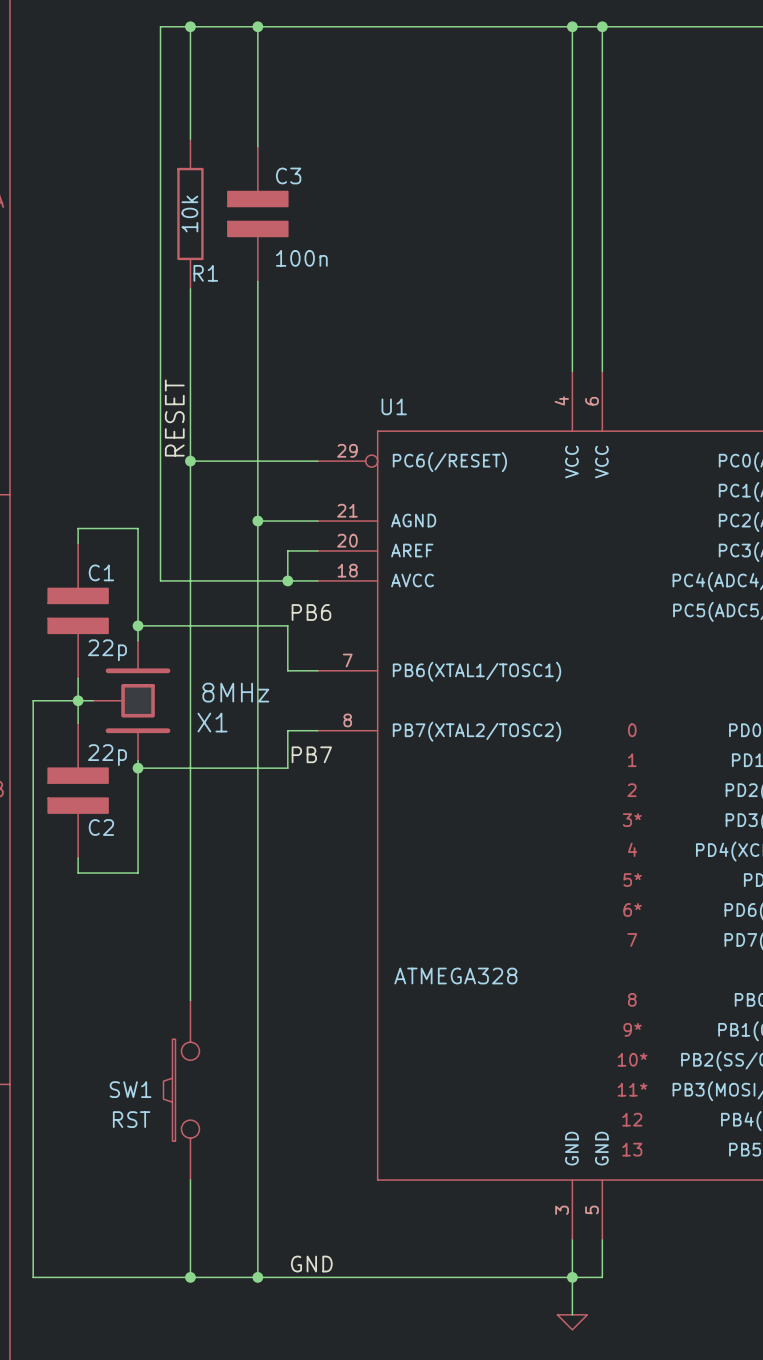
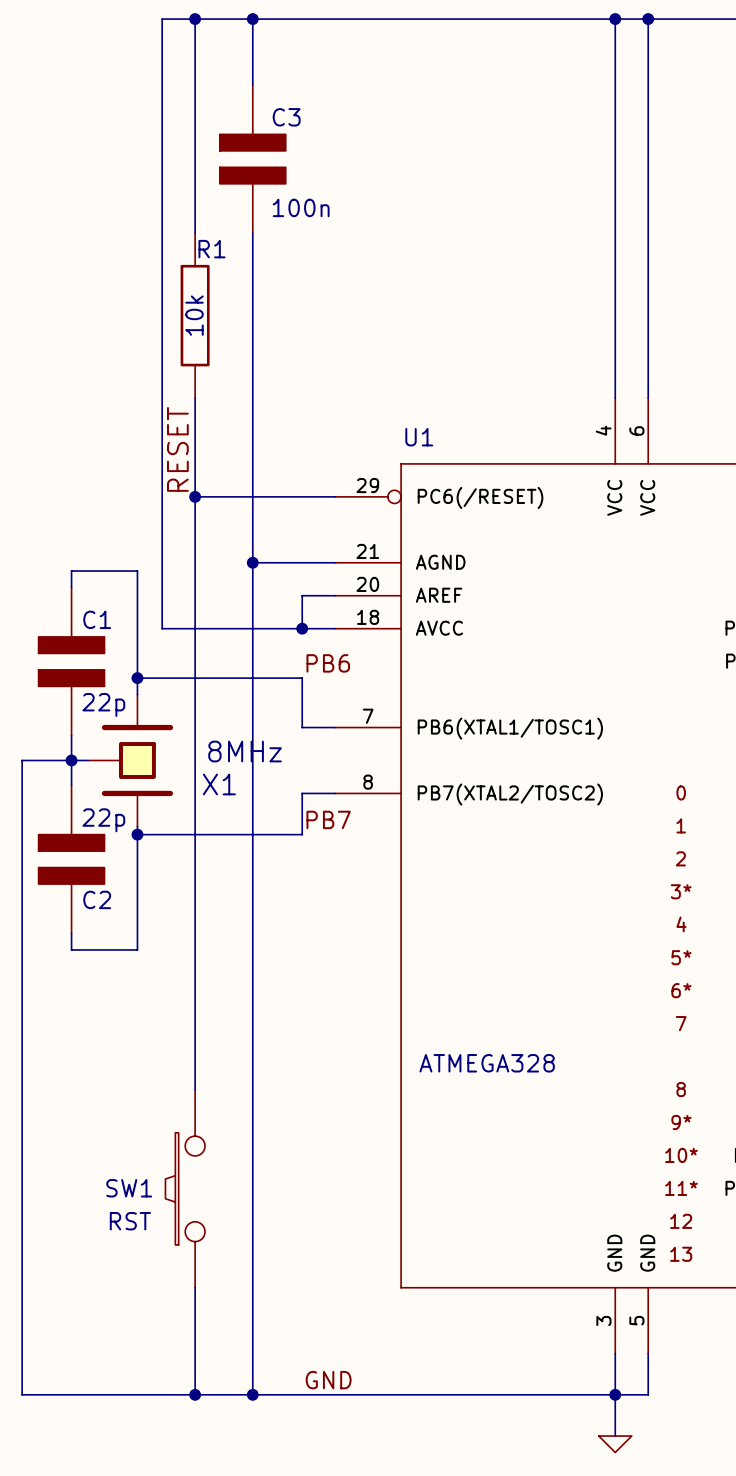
wire: none -> (252, 19) (252, 84)
wire: (257, 26) (257, 146) -> none
junction position: (257, 26) -> (252, 19)
R1 position: (190, 213) -> (195, 315)
C3 position: (257, 213) -> (252, 159)
wire: none -> (252, 233) (252, 1394)
R1 name position: R1 (205, 273) -> R1 (211, 249)
wire: (257, 281) (257, 1277) -> none
wire: (190, 288) (190, 371) -> (195, 142) (195, 233)
wire: none -> (252, 562) (269, 562)
junction position: (257, 521) -> (252, 562)
junction position: (257, 1277) -> (252, 1394)

